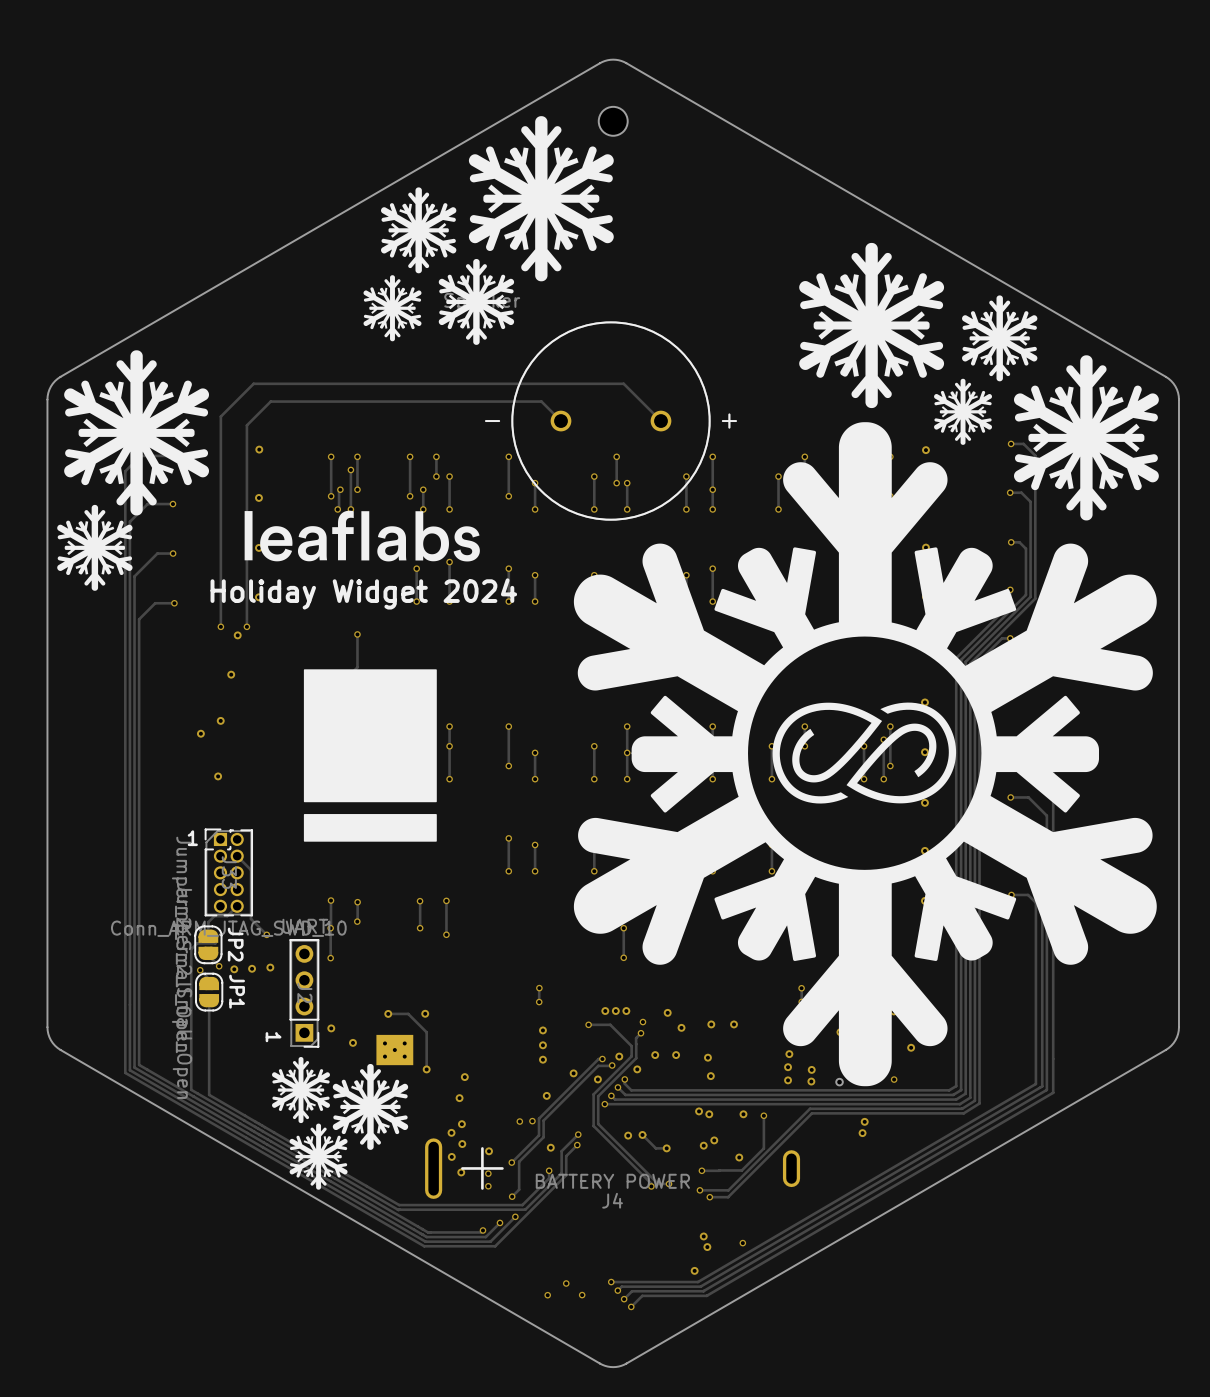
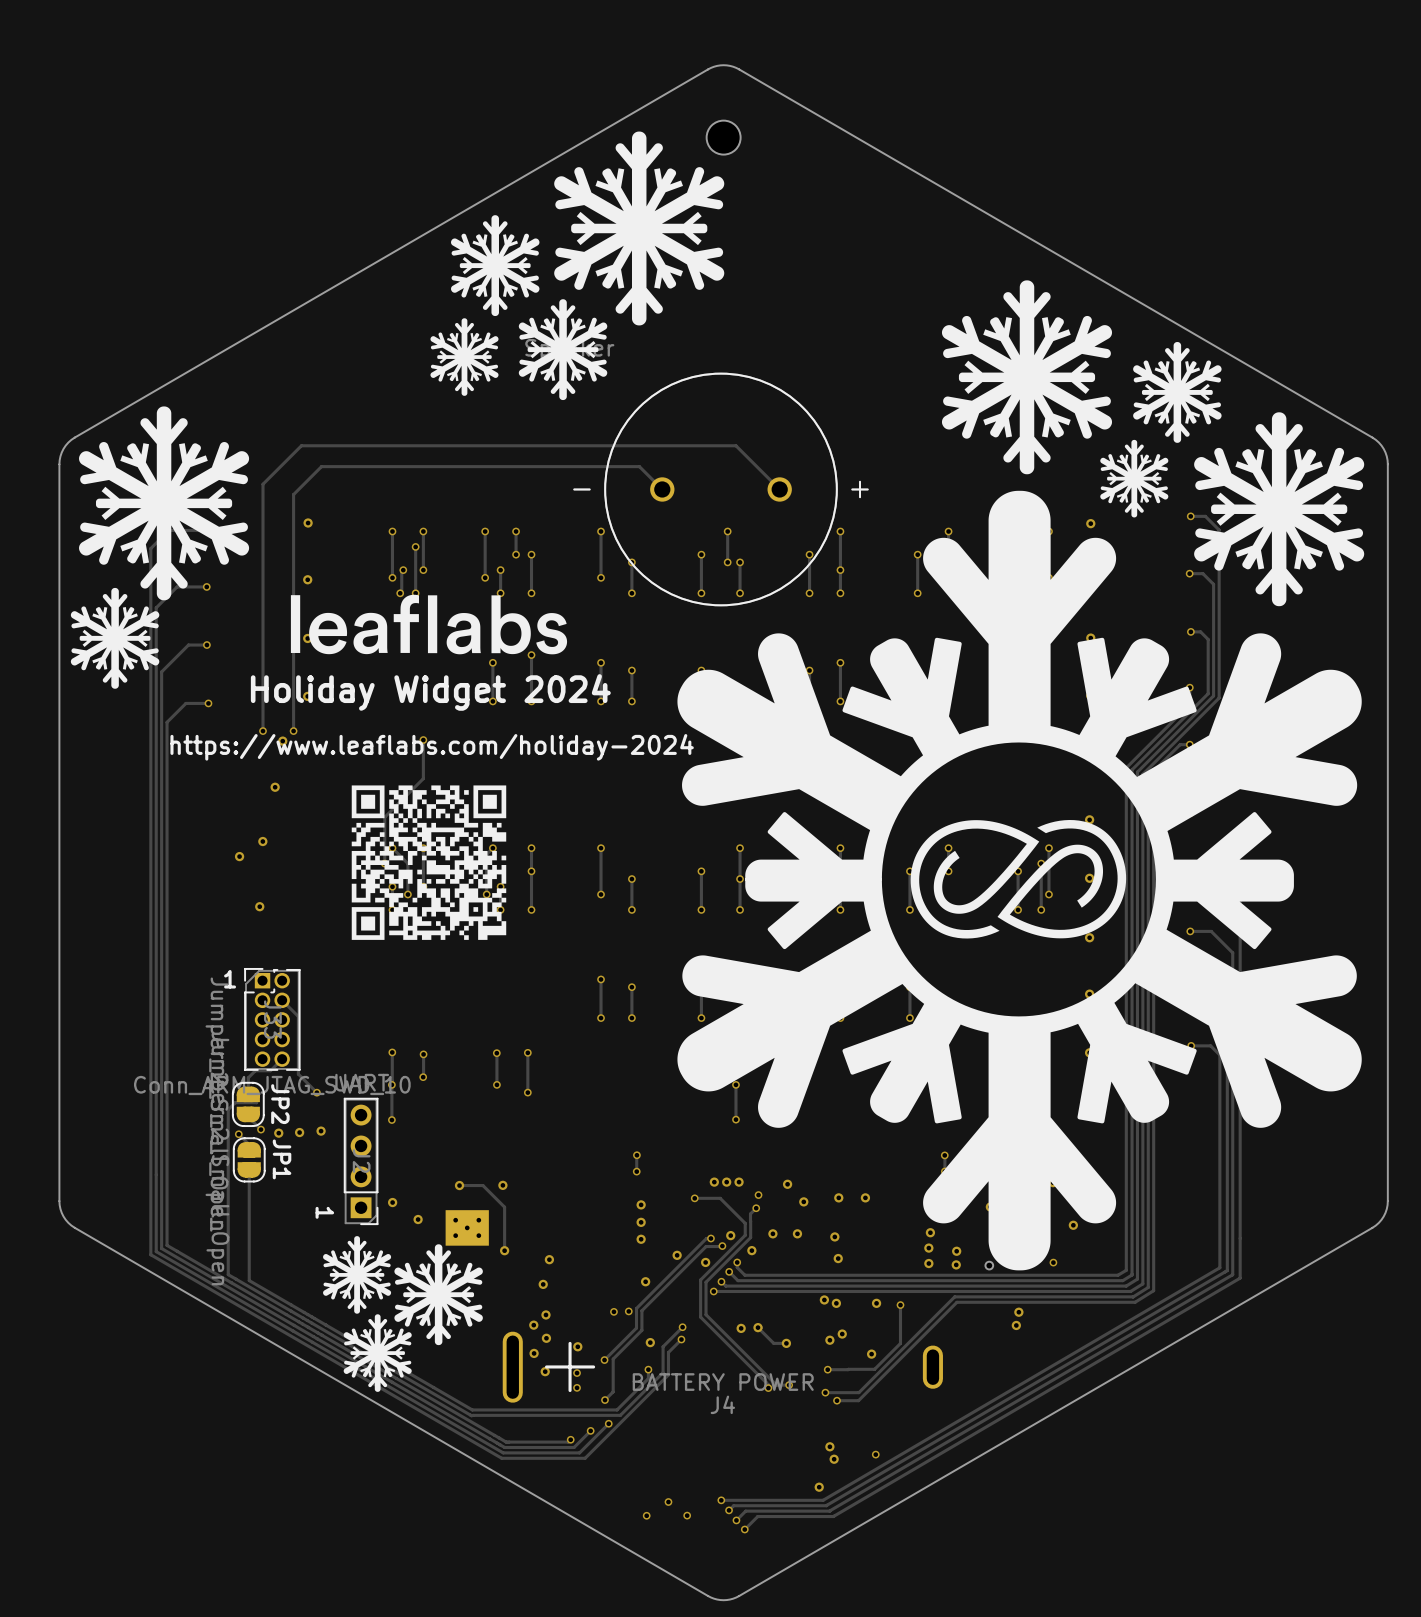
text: none -> https://www.leaflabs.com/holiday-2024 (432, 747)
drawing: [303, 669, 437, 842] -> none
drawing: none -> [351, 785, 507, 940]

